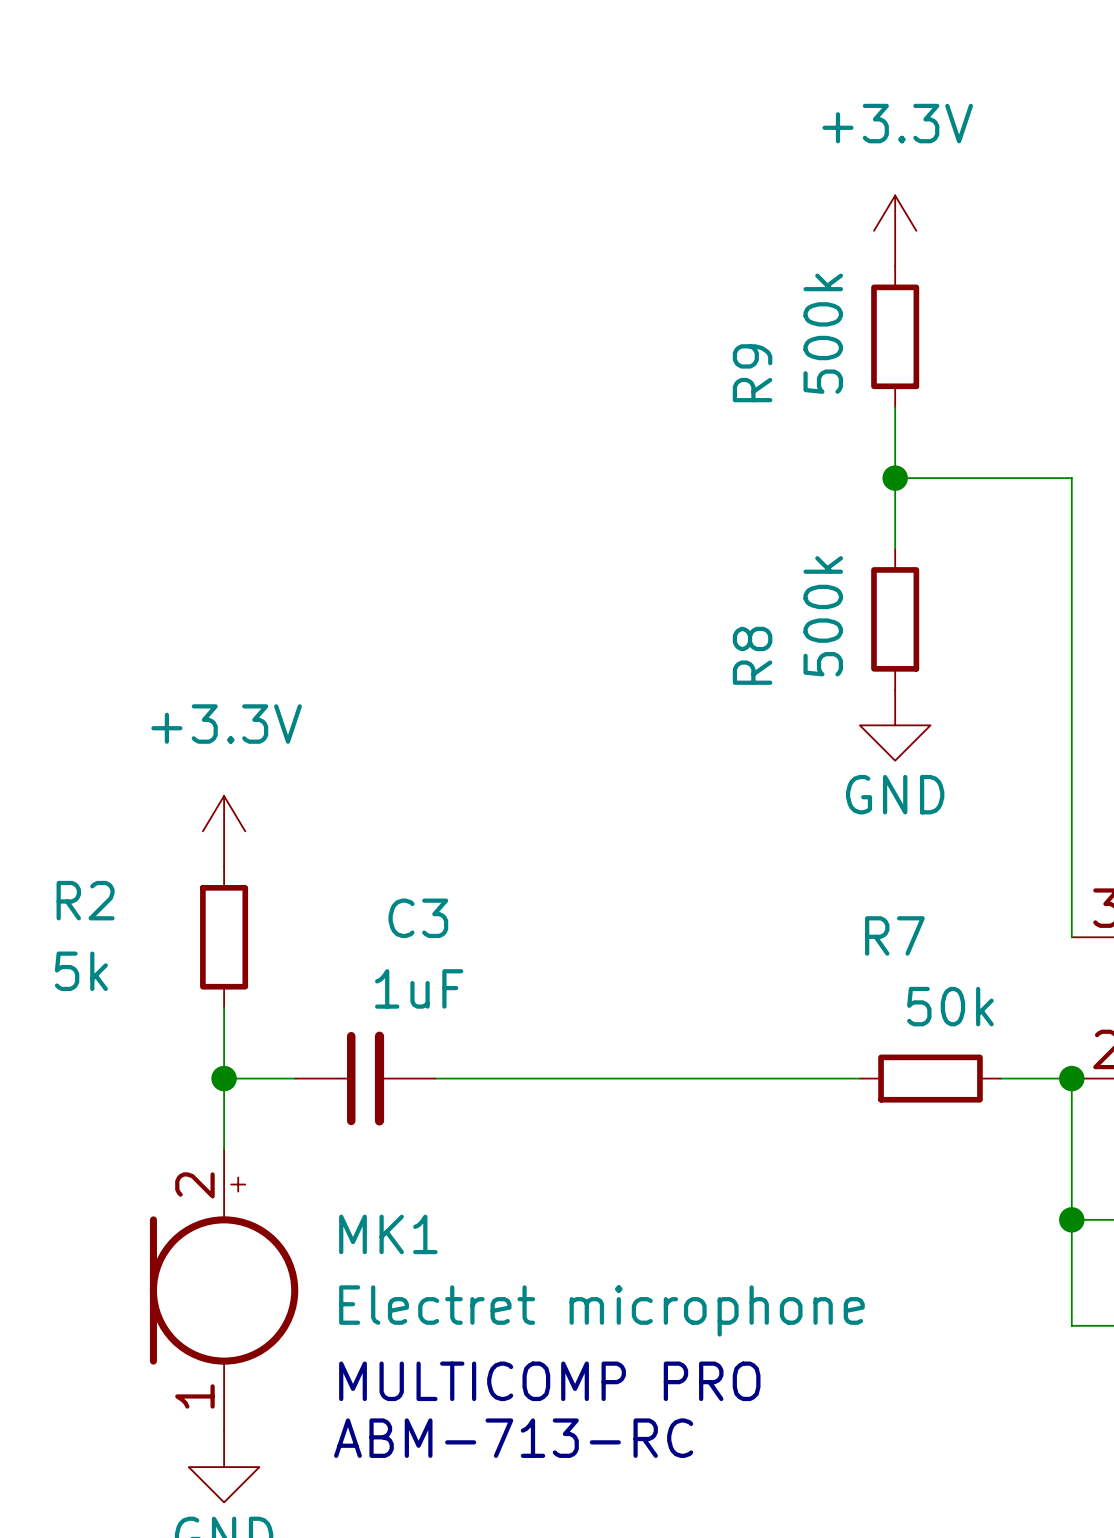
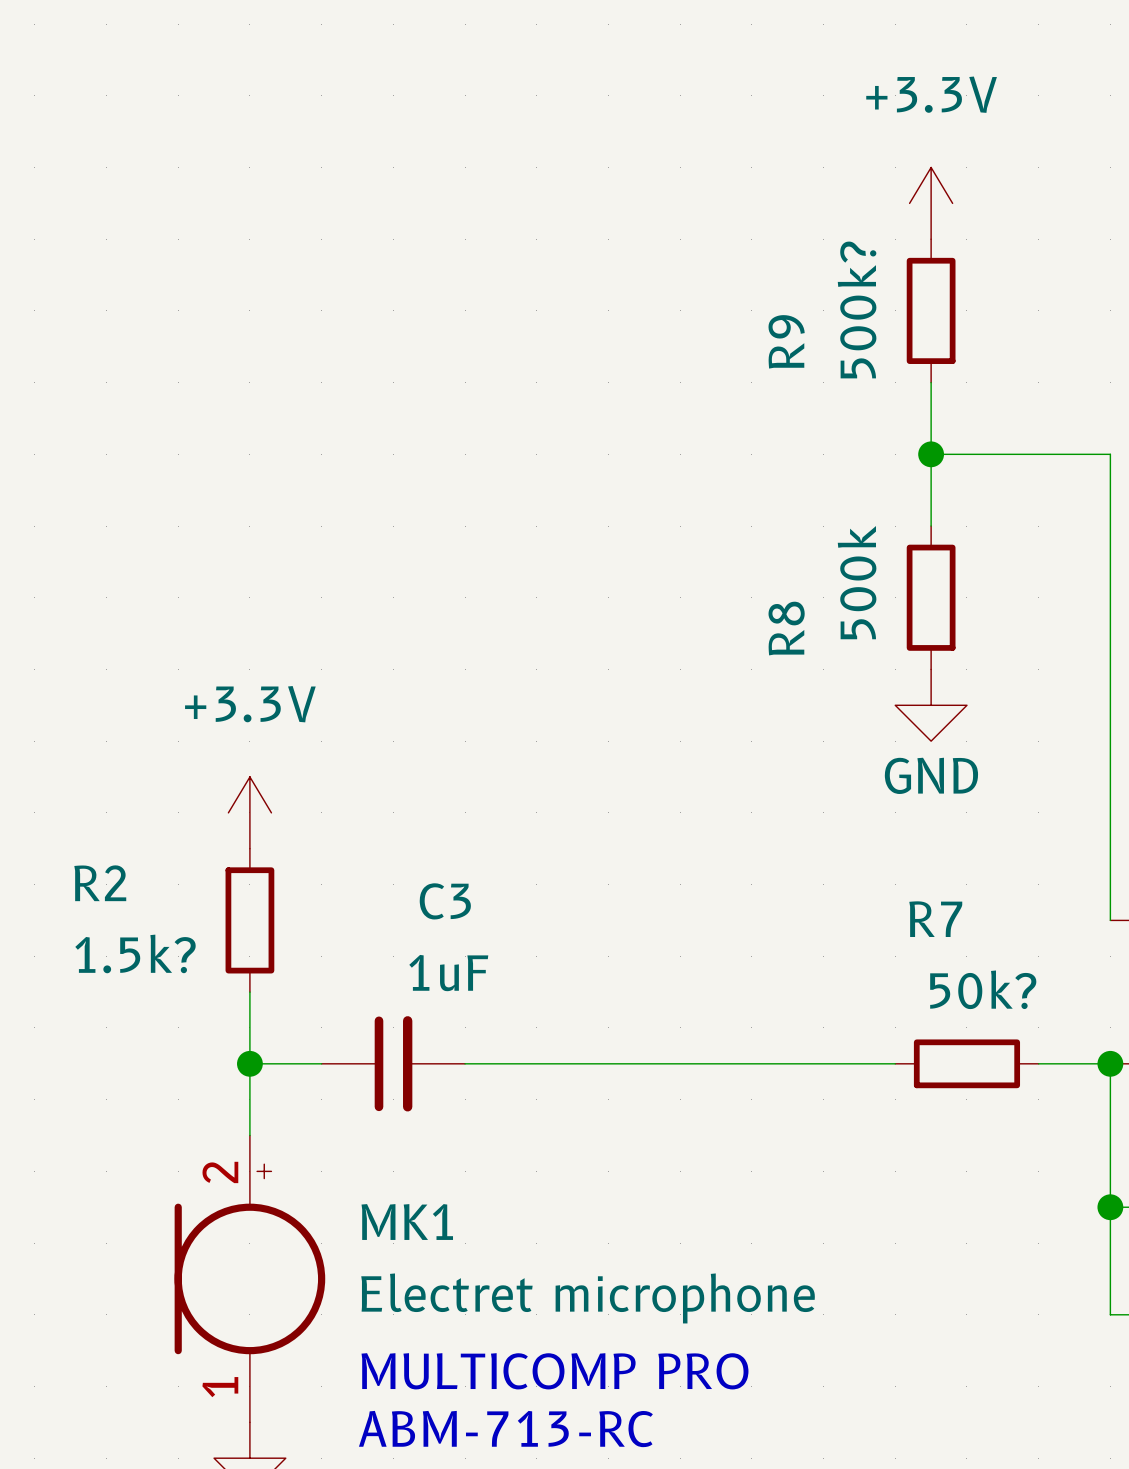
R9 value: 500k (823, 333) -> 500k? (857, 309)
R2 value: 5k (81, 971) -> 1.5k? (135, 953)
R7 value: 50k (950, 1006) -> 50k? (983, 989)

